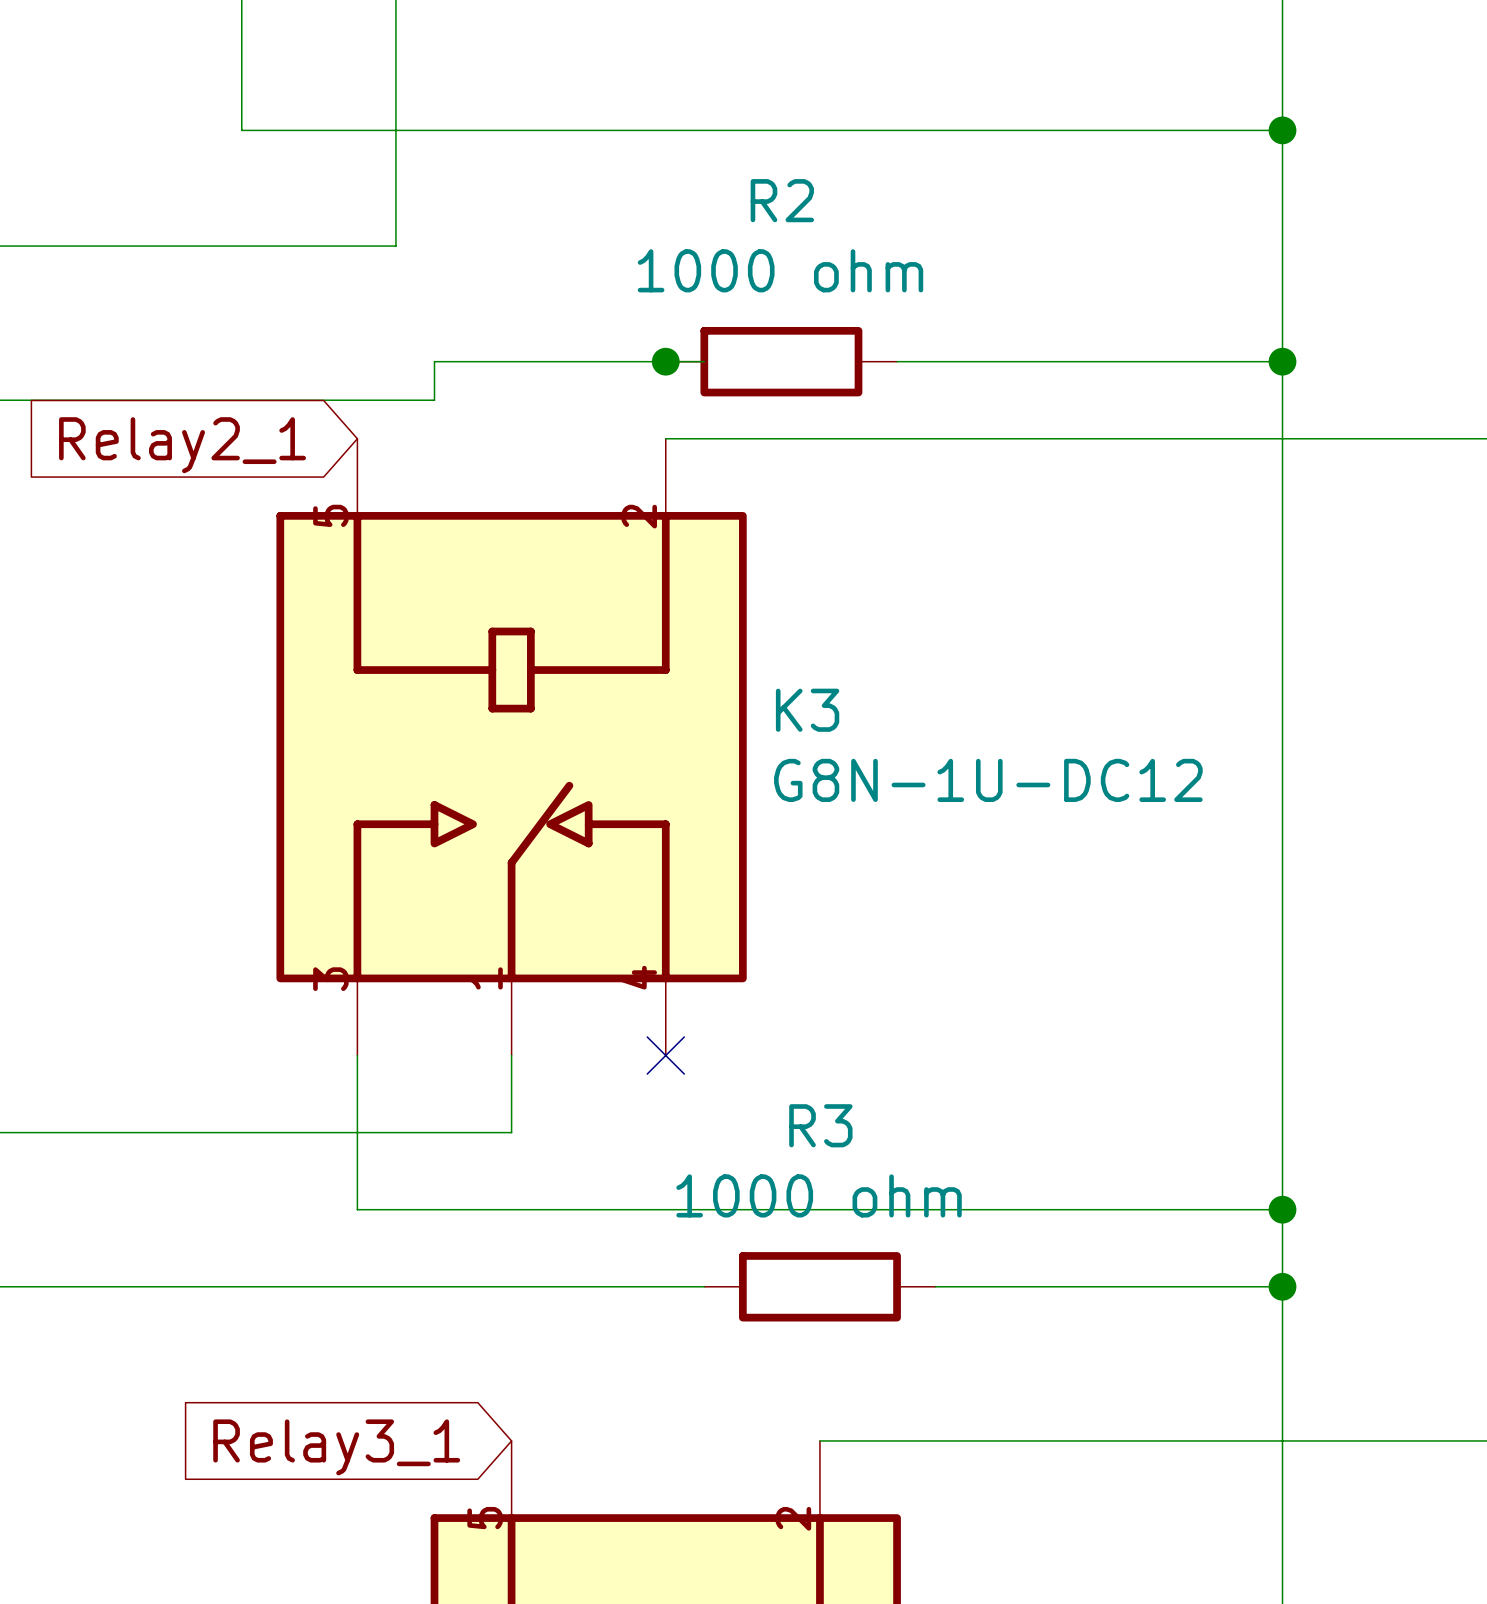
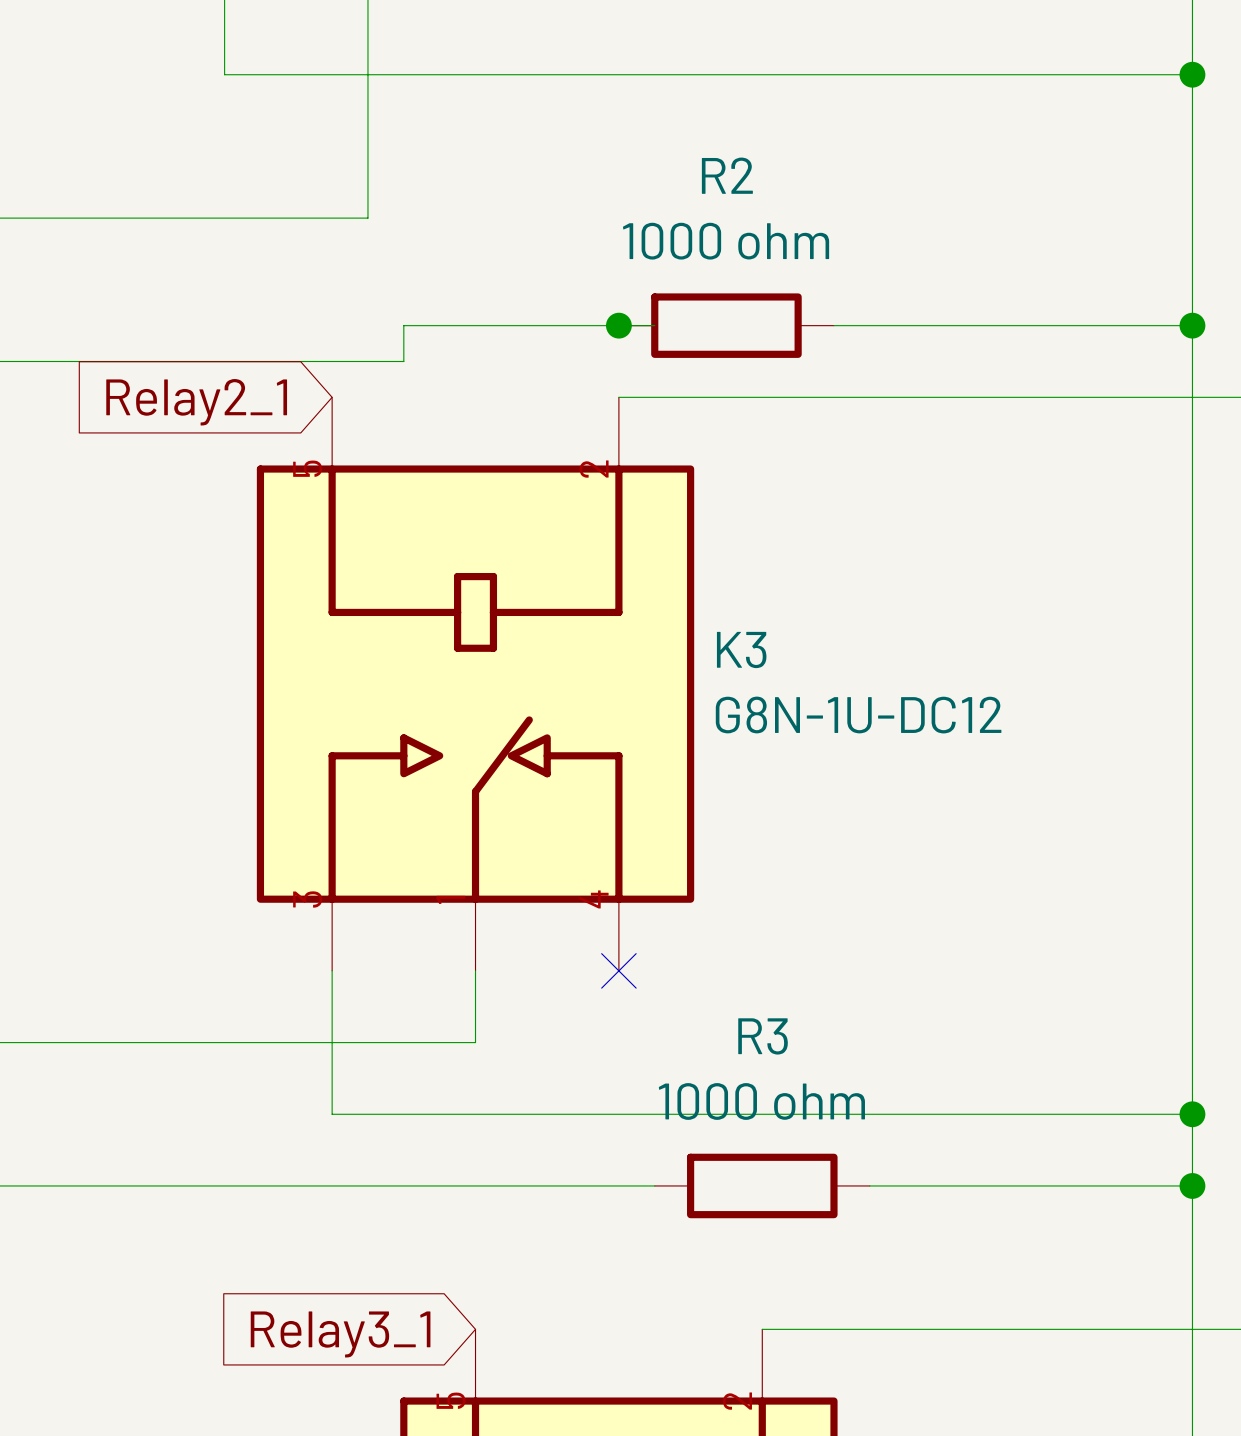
wire: (241, 91) (241, 130) (1282, 130) -> (224, 74) (1192, 74)
junction position: (1282, 130) -> (1192, 74)

